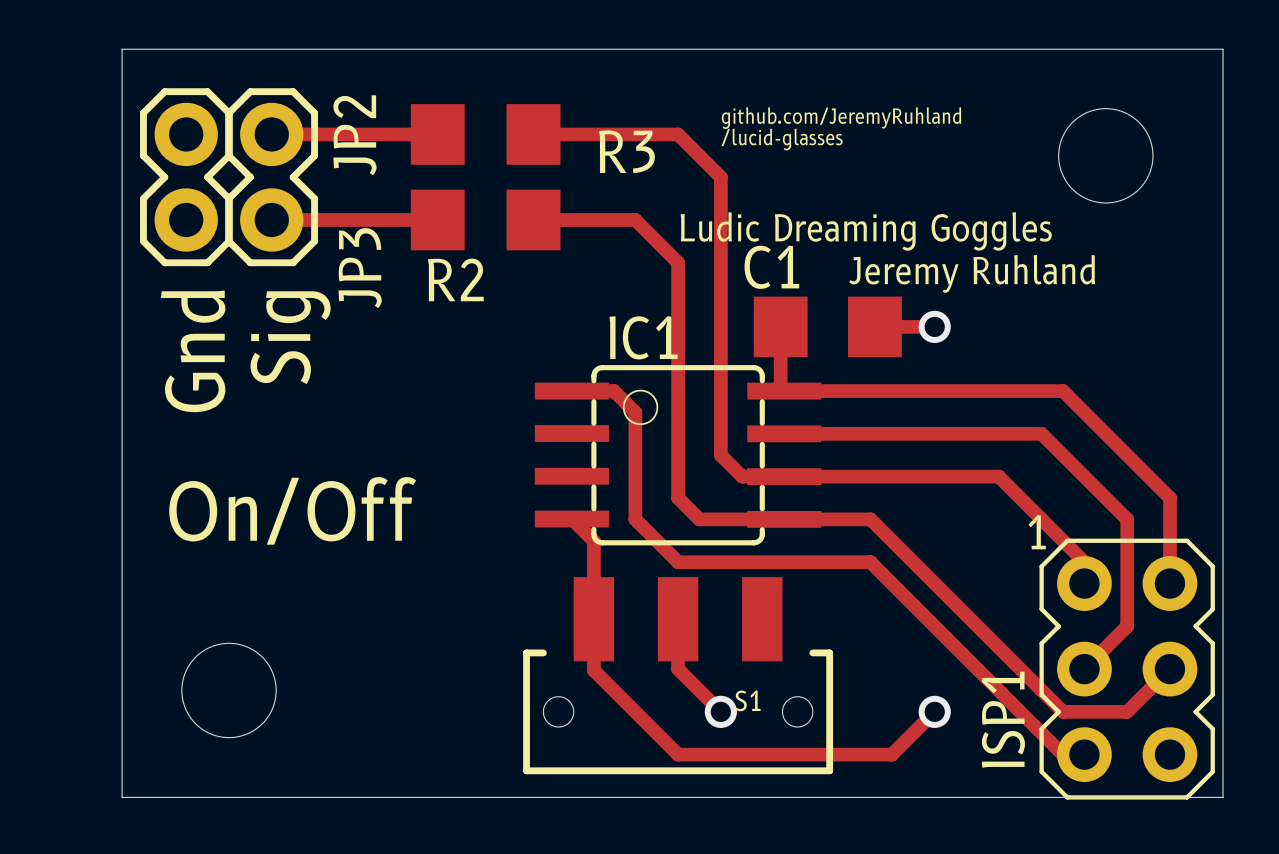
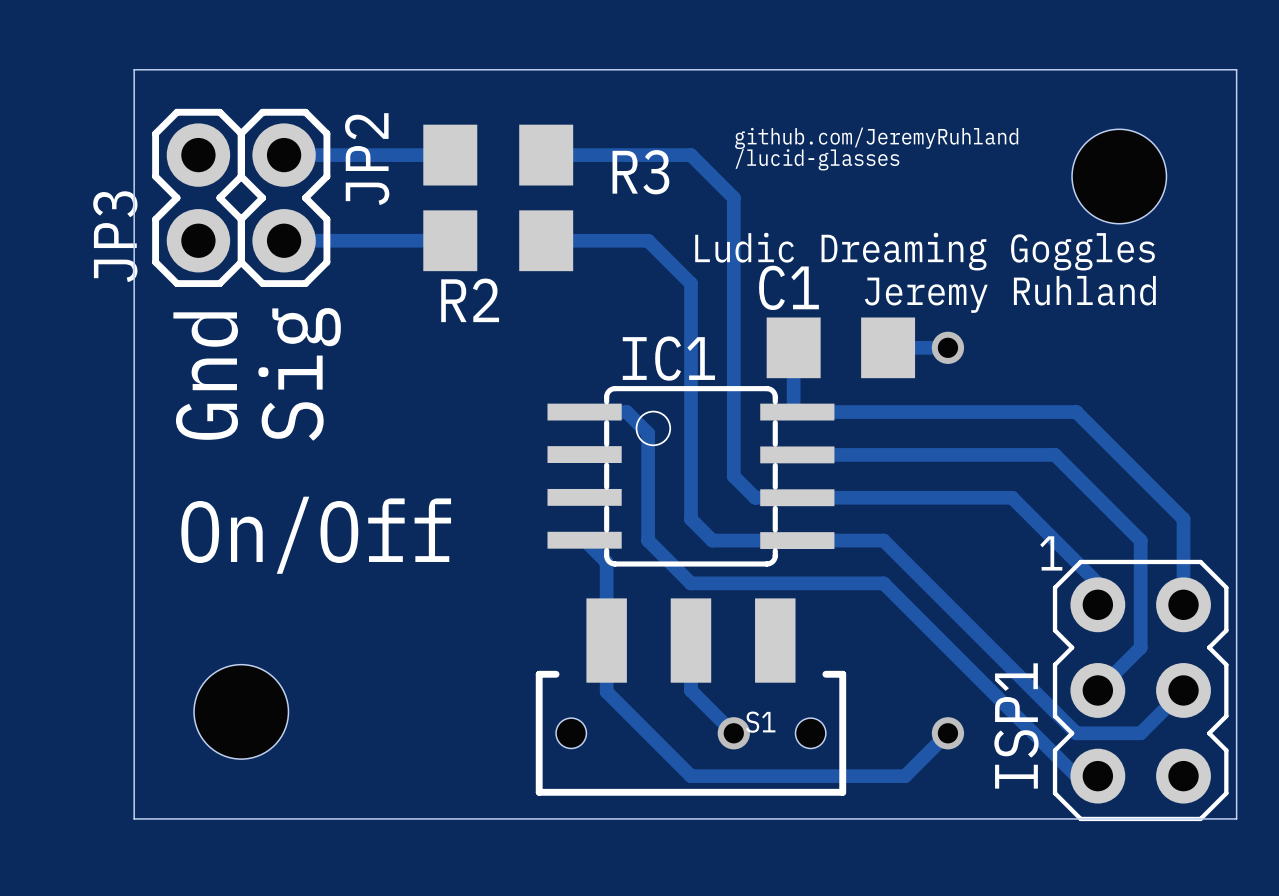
JP3 name position: JP3 (360, 268) -> JP3 (115, 236)

